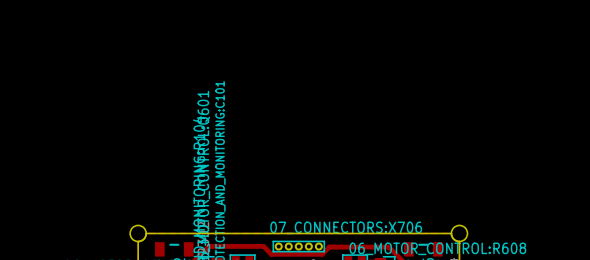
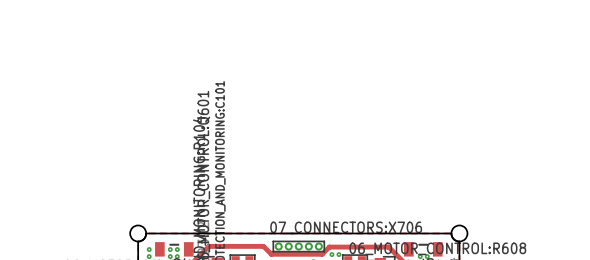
via: none -> (149, 249)
via: none -> (170, 249)
via: none -> (177, 249)
via: none -> (331, 254)
via: none -> (338, 254)
via: none -> (149, 256)
via: none -> (170, 256)
via: none -> (177, 256)
via: none -> (420, 256)
via: none -> (427, 256)

